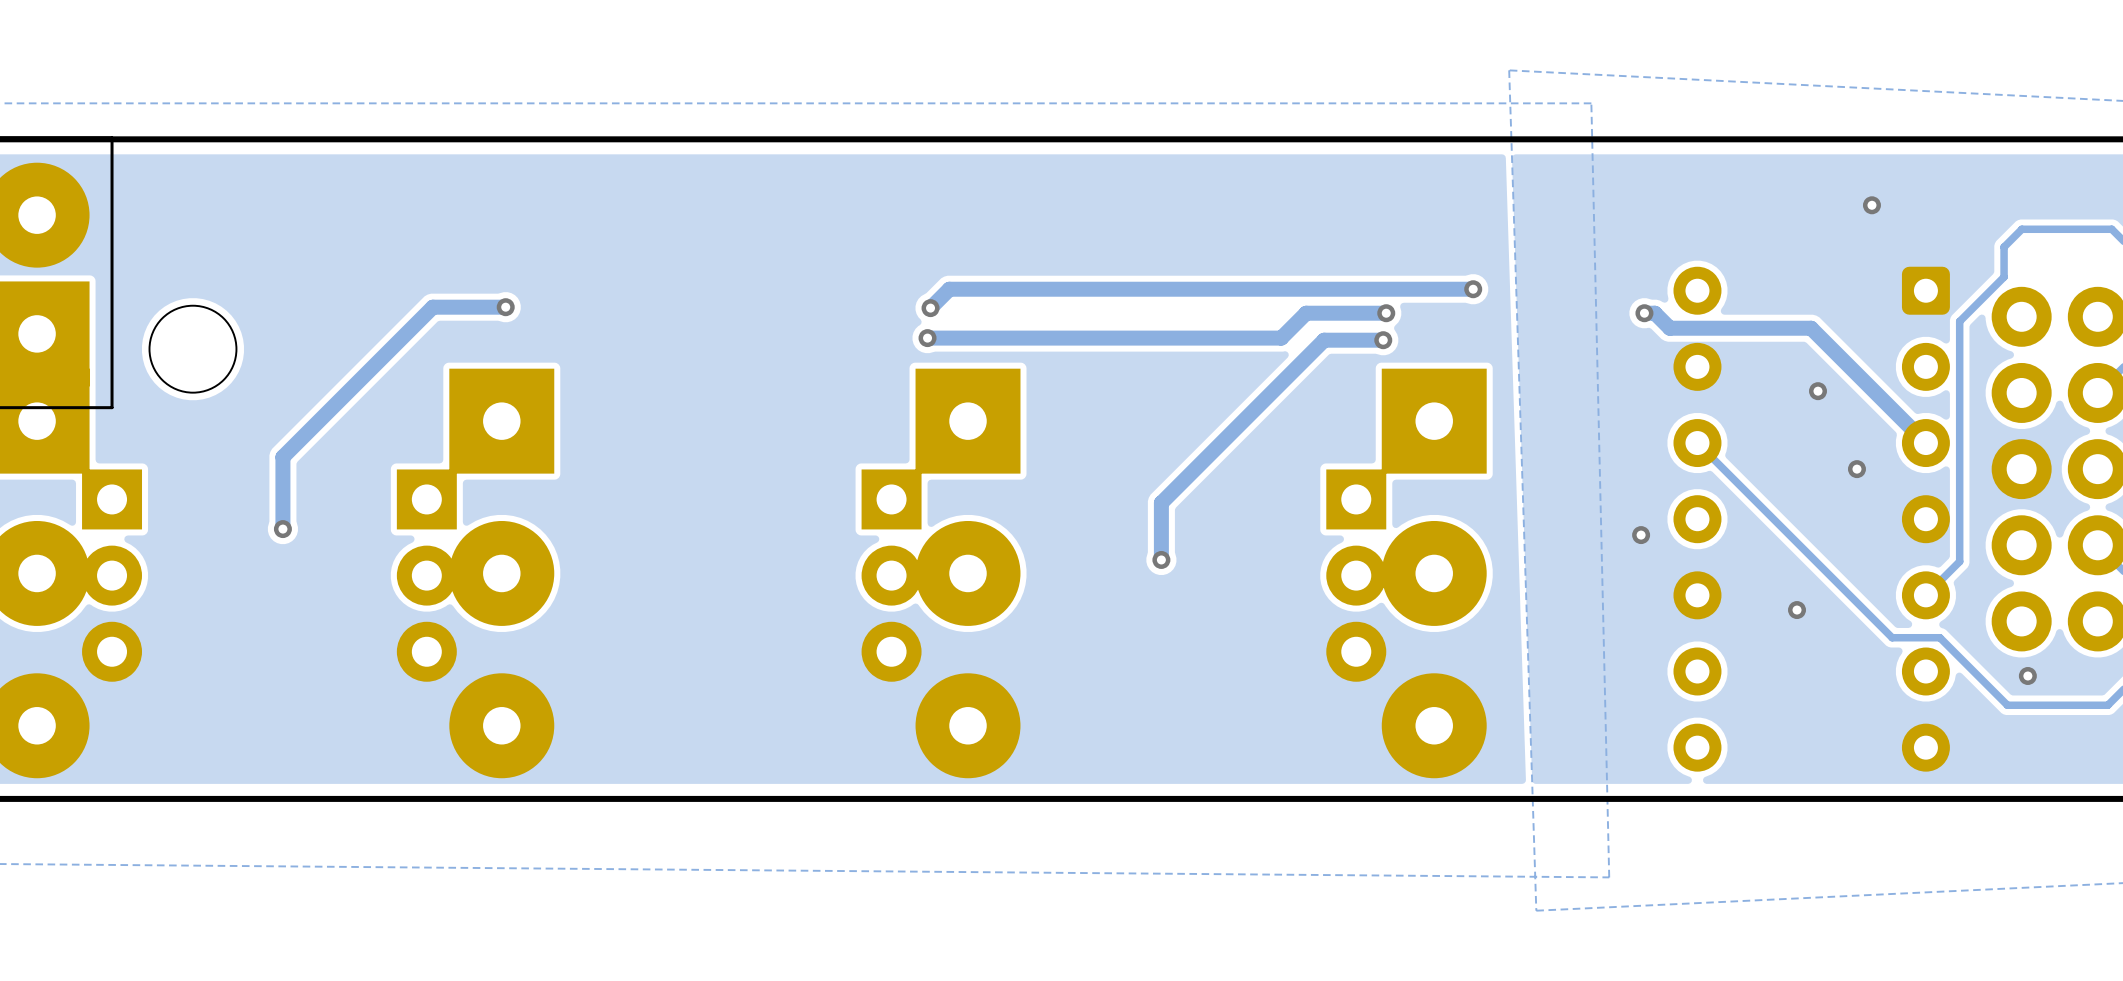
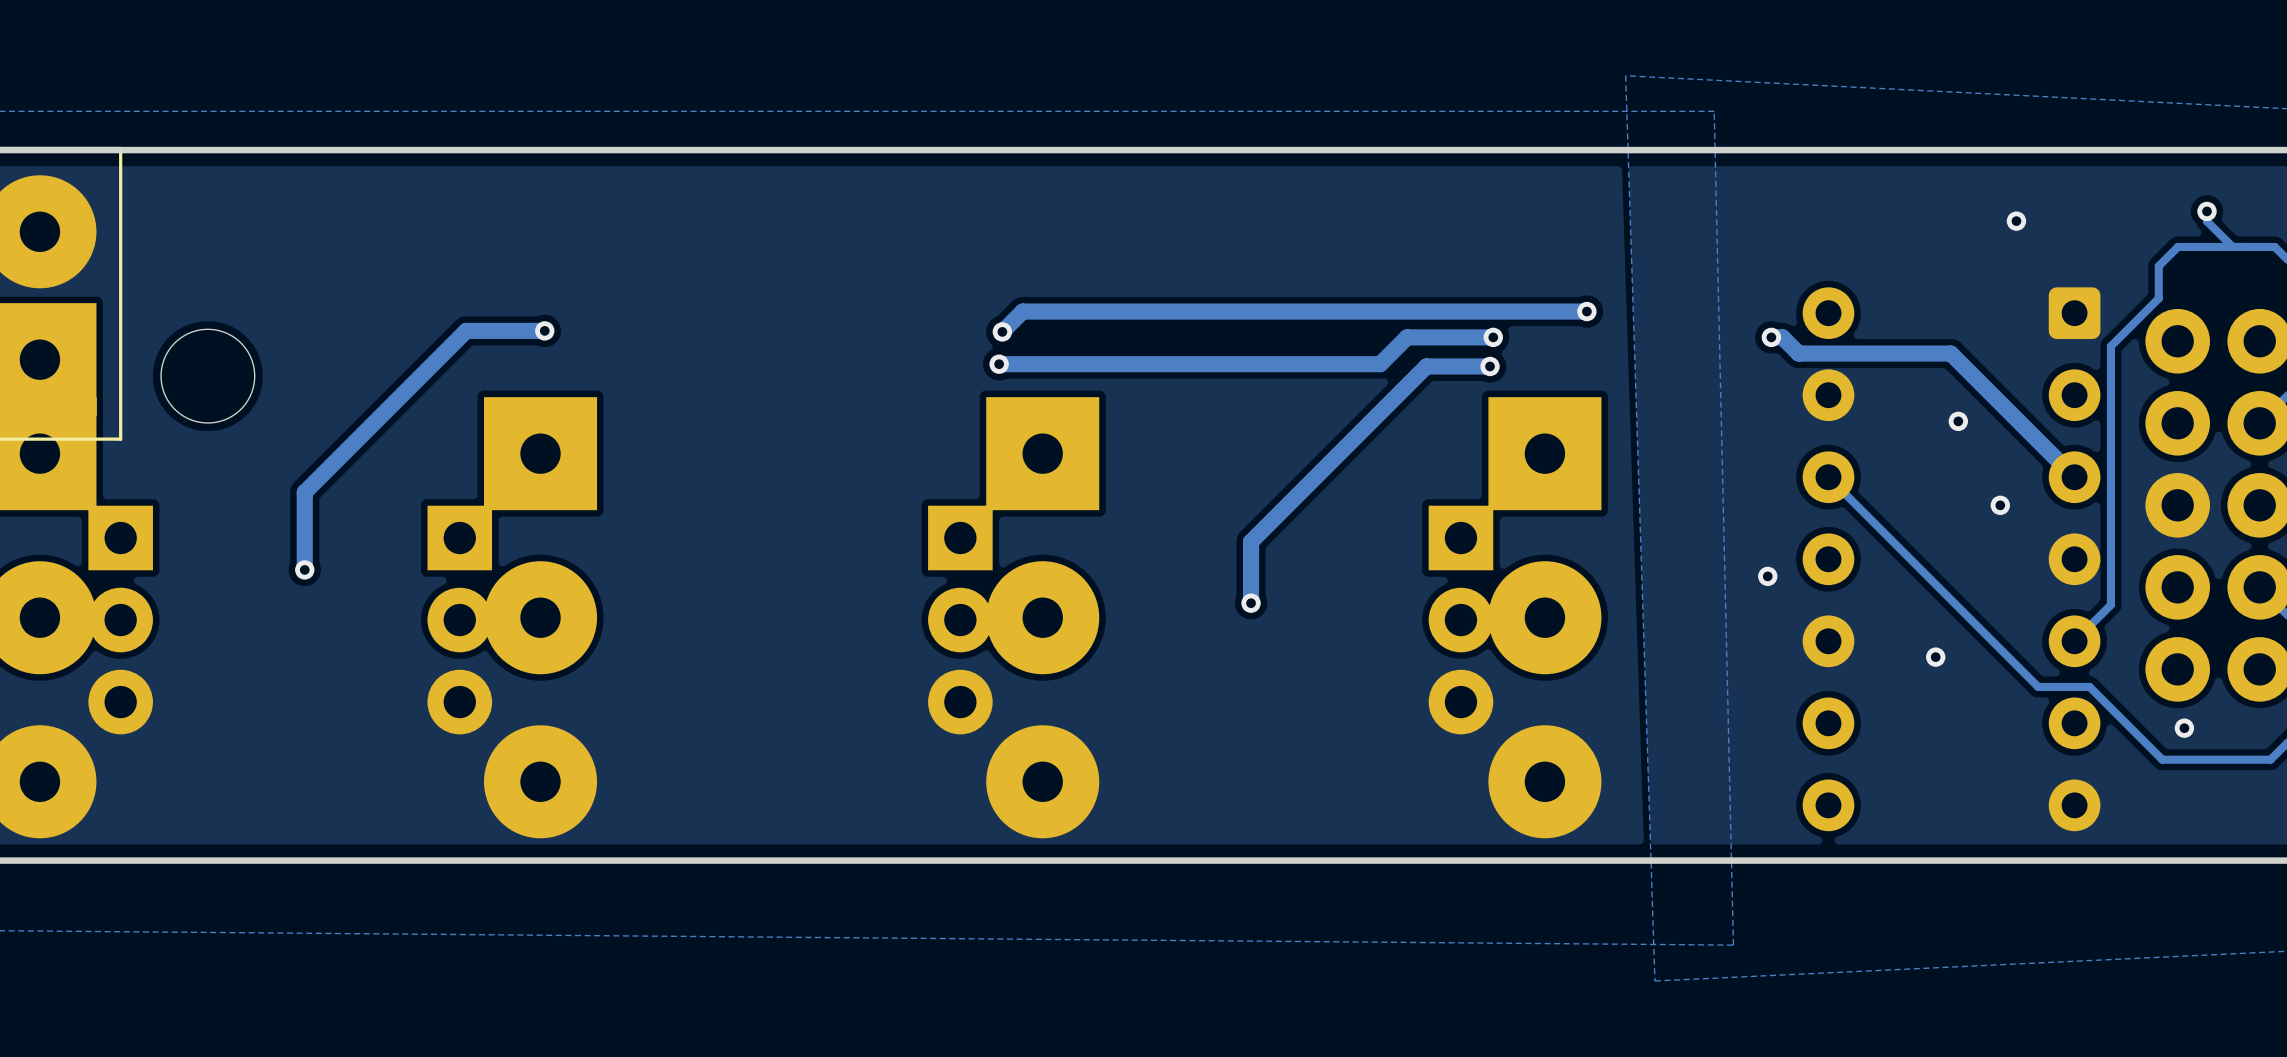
track: none -> (2207, 211) (2207, 221) (2232, 246)
via: none -> (2207, 211)

